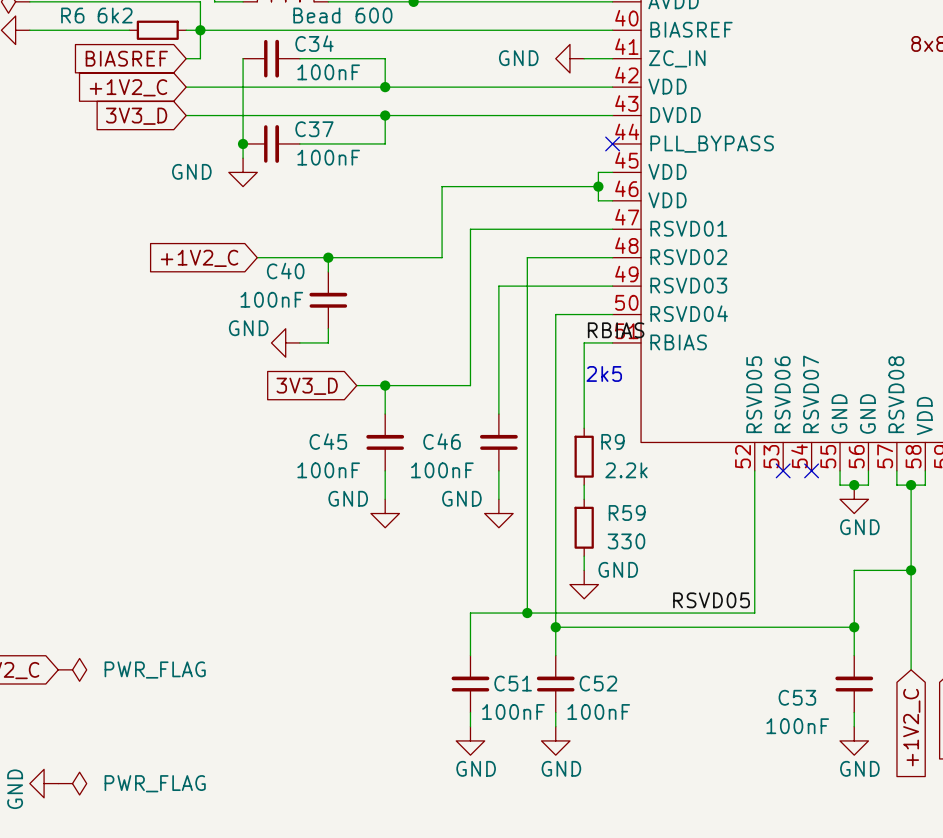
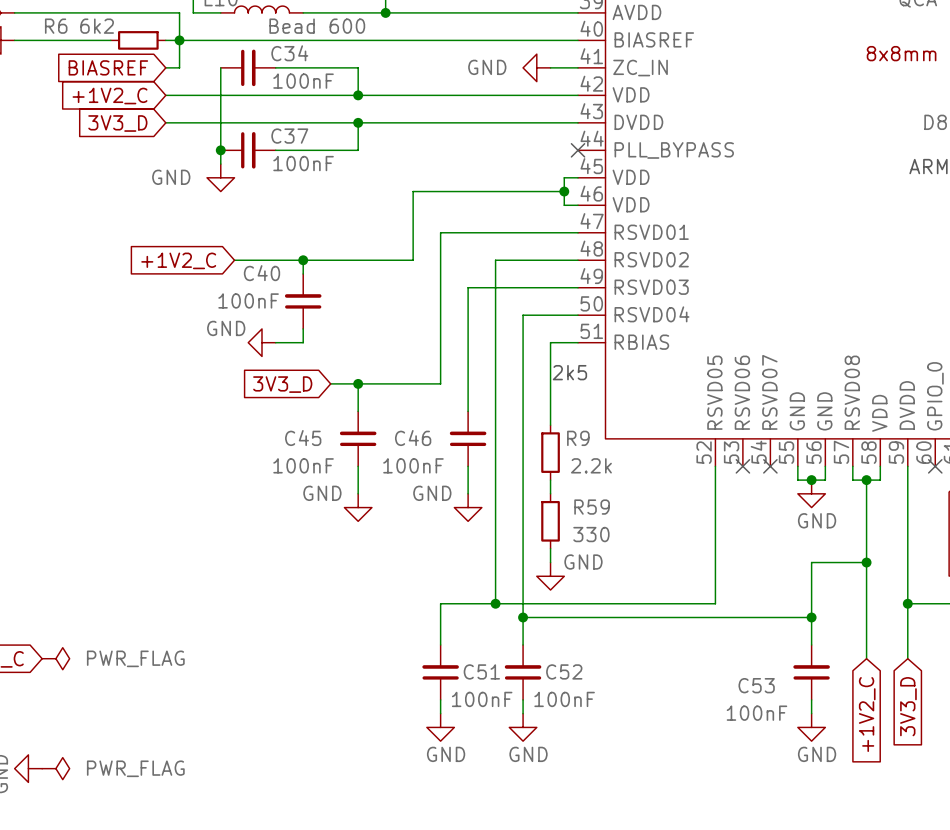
label: RBIAS (616, 330) -> none
label: RSVD05 (711, 600) -> none

